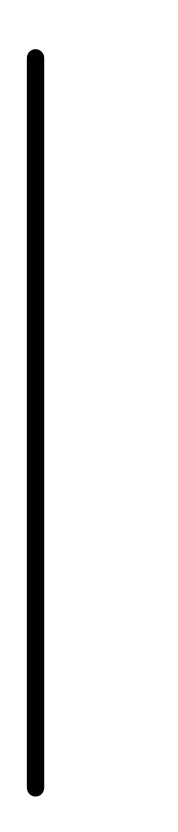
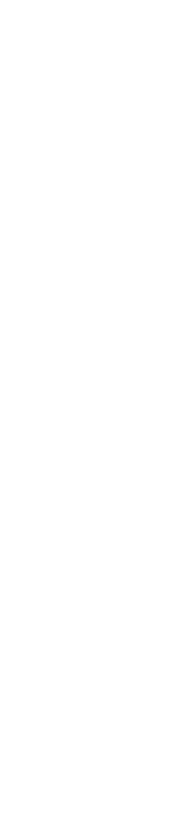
board edge: (35, 57) (35, 787) -> none

